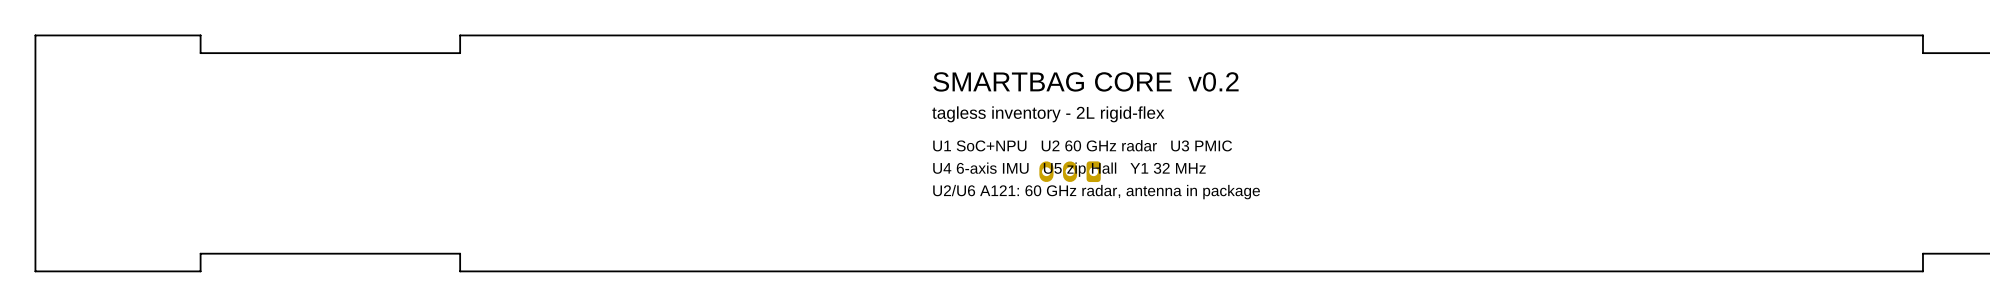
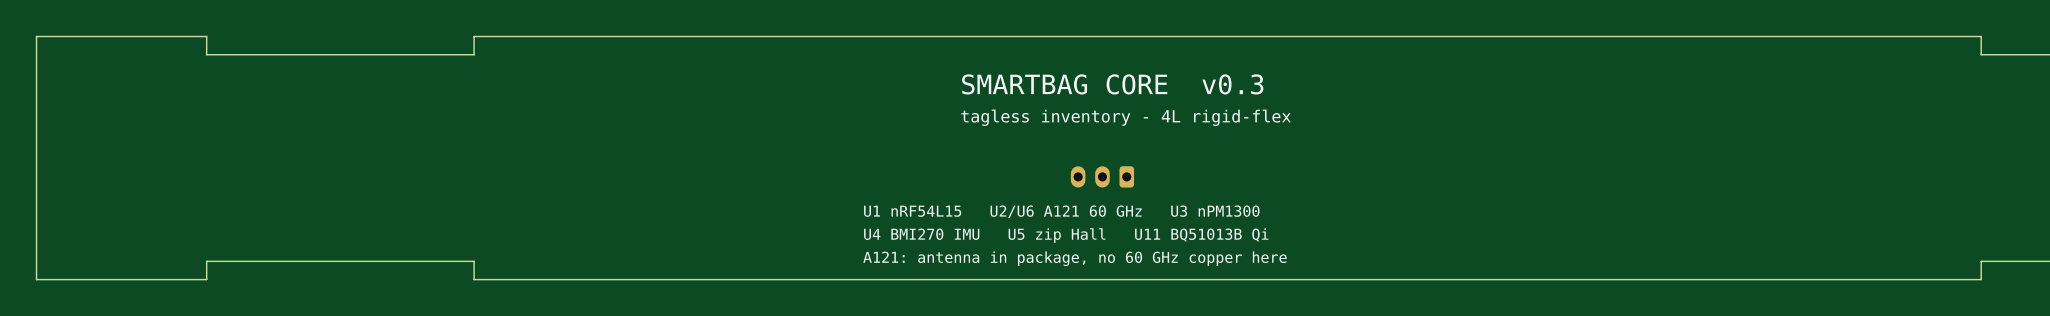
text: SMARTBAG CORE v0.2 (1085, 81) -> SMARTBAG CORE v0.3 (1112, 84)
text: tagless inventory - 2L rigid-flex (1048, 114) -> tagless inventory - 4L rigid-flex (1126, 117)
text: U1 SoC+NPU U2 60 GHz radar U3 PMIC (1082, 145) -> none
text: U4 6-axis IMU U5 zip Hall Y1 32 MHz (1069, 169) -> none
text: U2/U6 A121: 60 GHz radar, antenna in package (1096, 192) -> none
text: none -> U1 nRF54L15 U2/U6 A121 60 GHz U3 nPM1300 (1061, 211)
text: none -> U4 BMI270 IMU U5 zip Hall U11 BQ51013B Qi (1066, 235)
text: none -> A121: antenna in package, no 60 GHz copper here (1074, 258)

